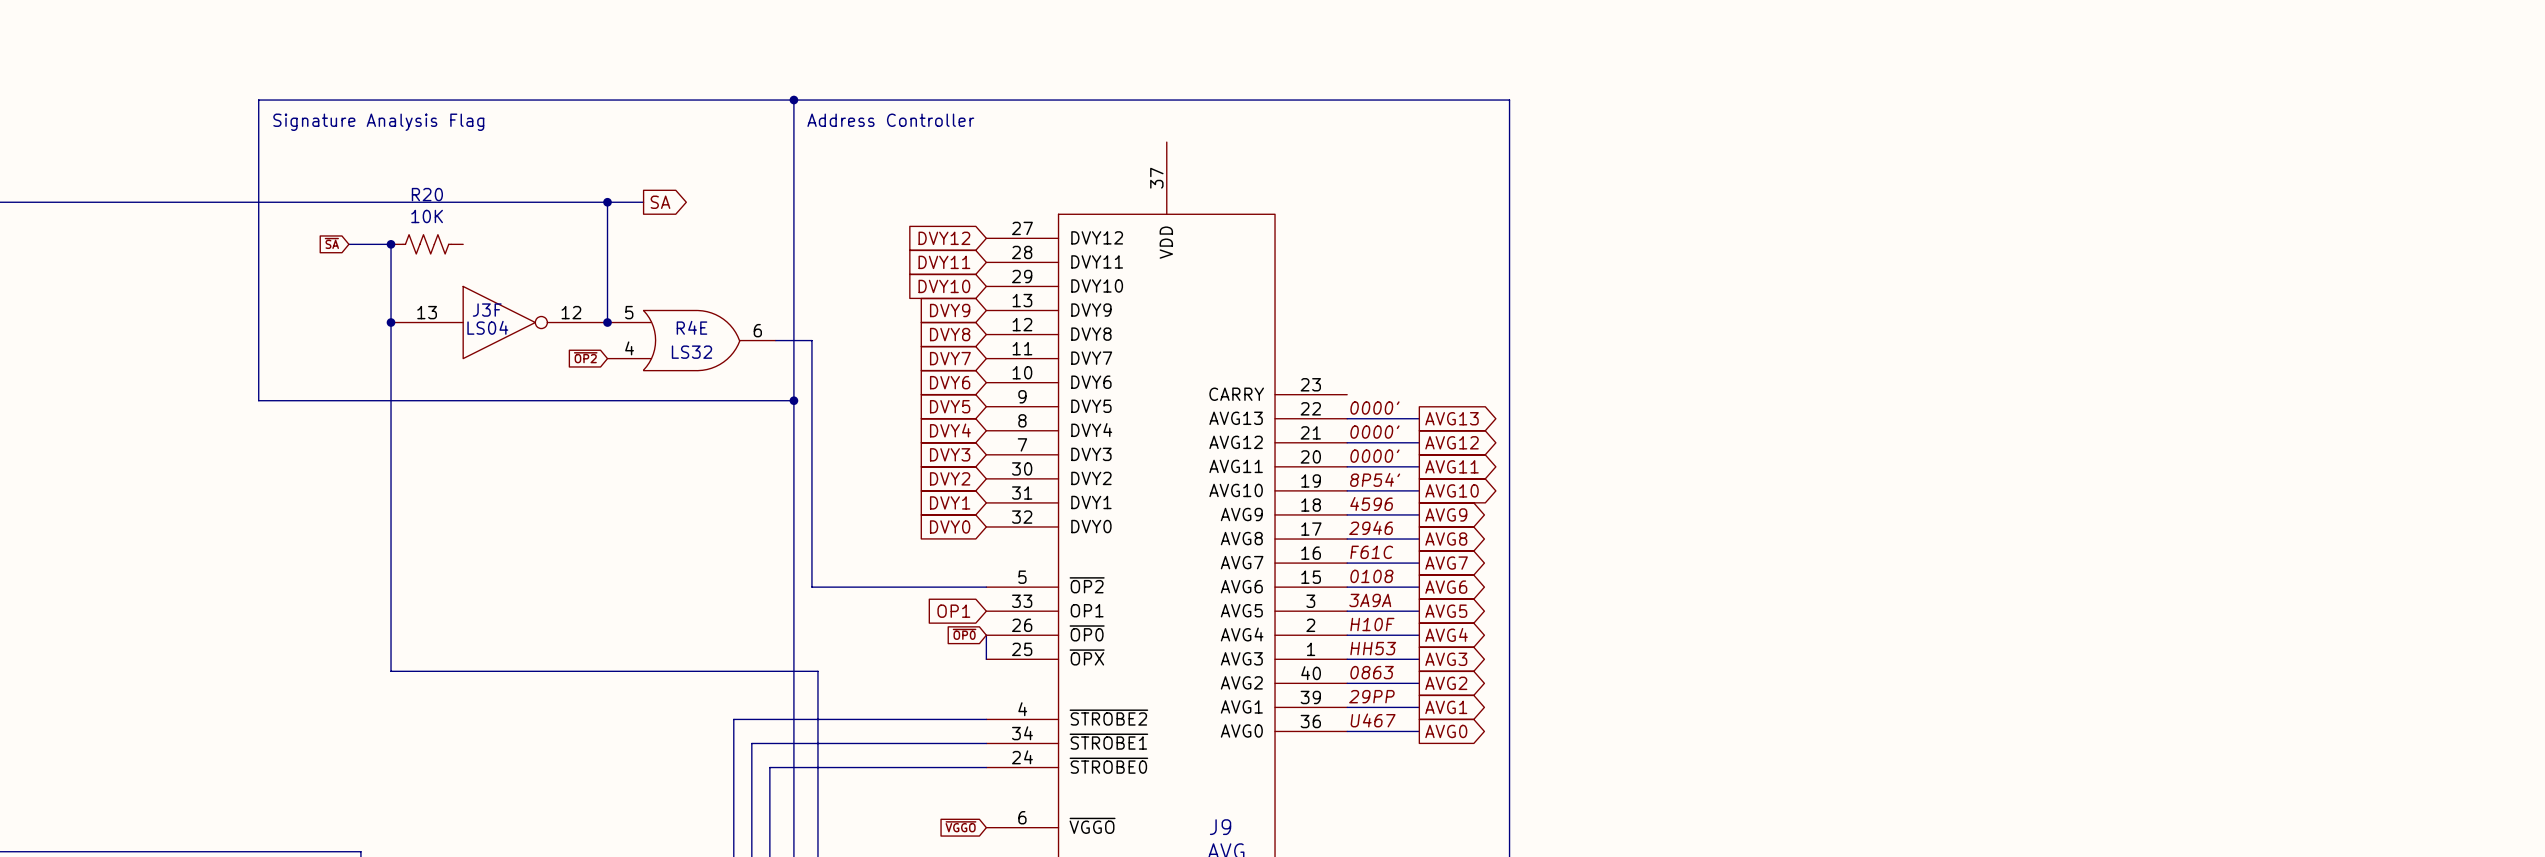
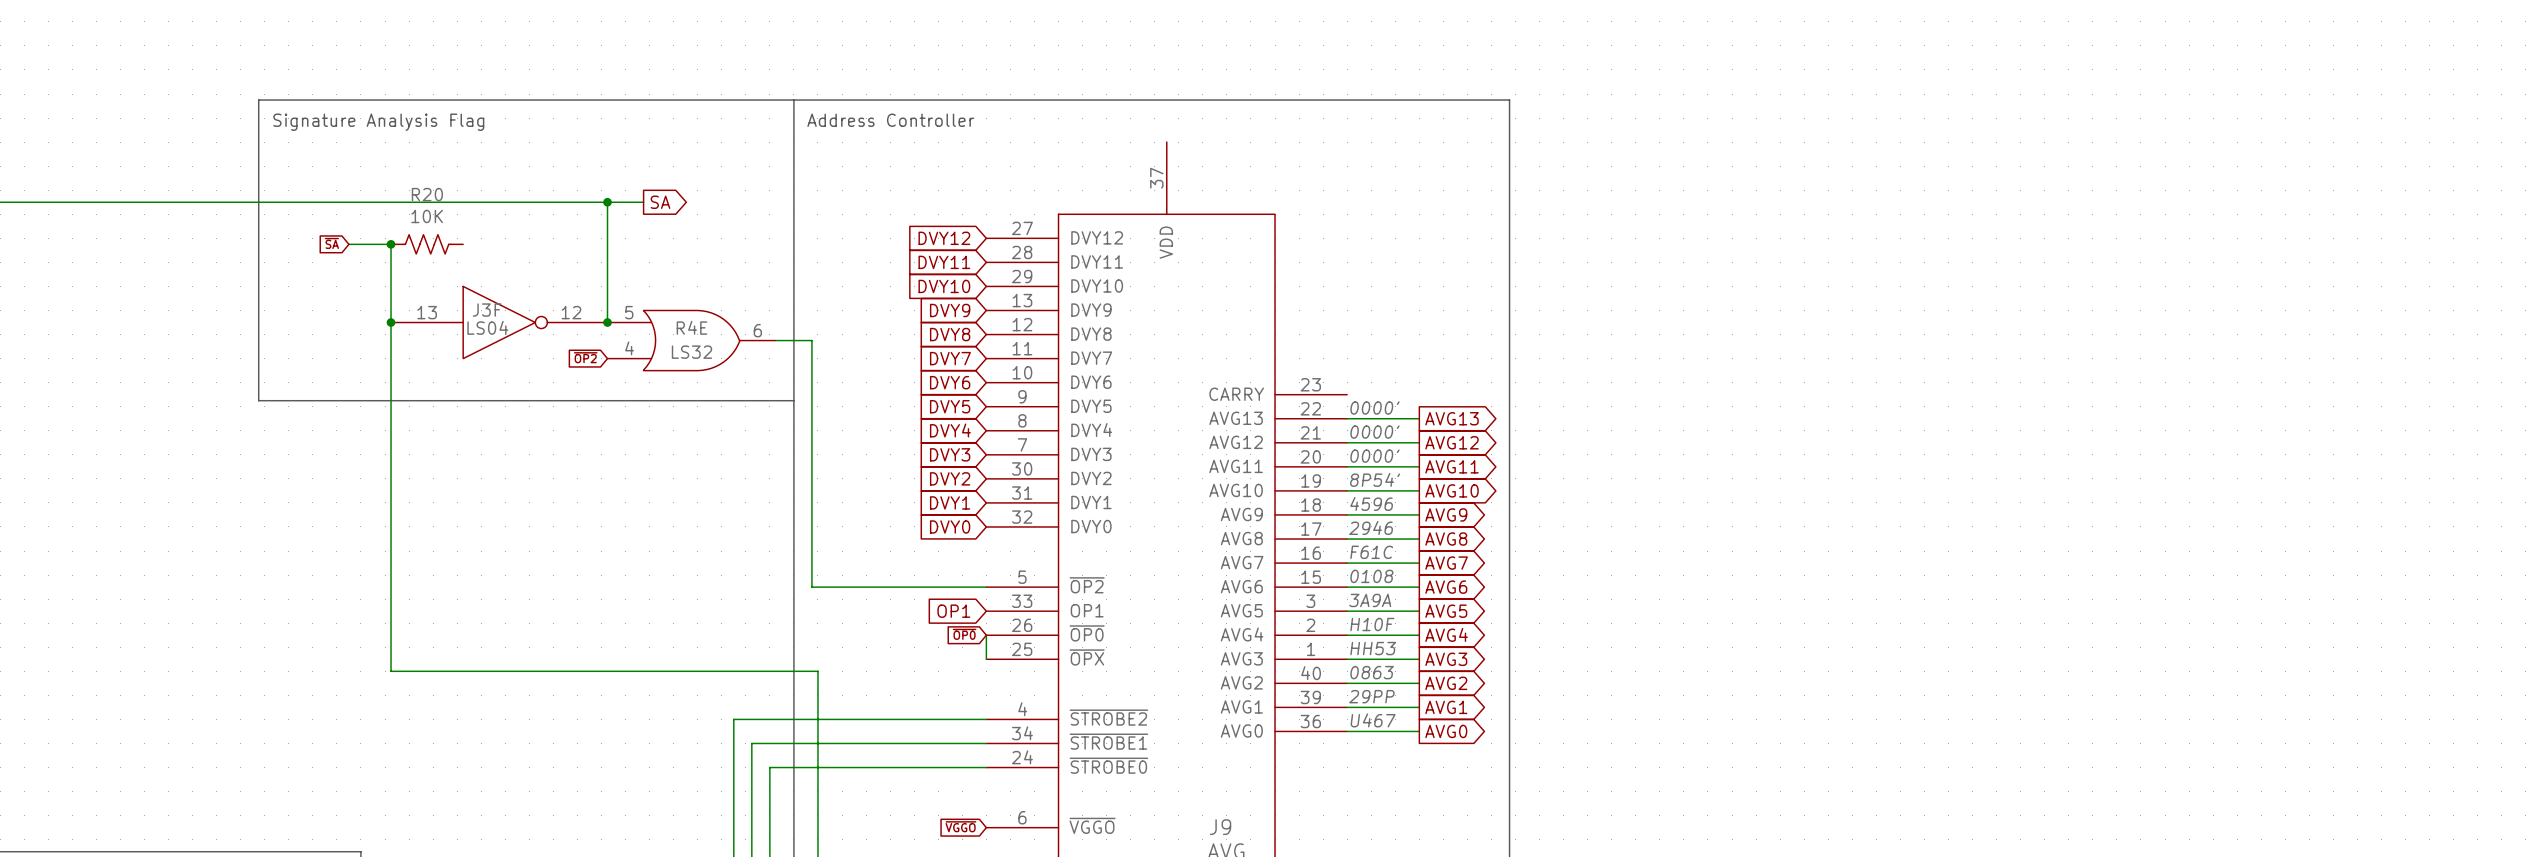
junction: (793, 100) -> none
junction: (793, 400) -> none

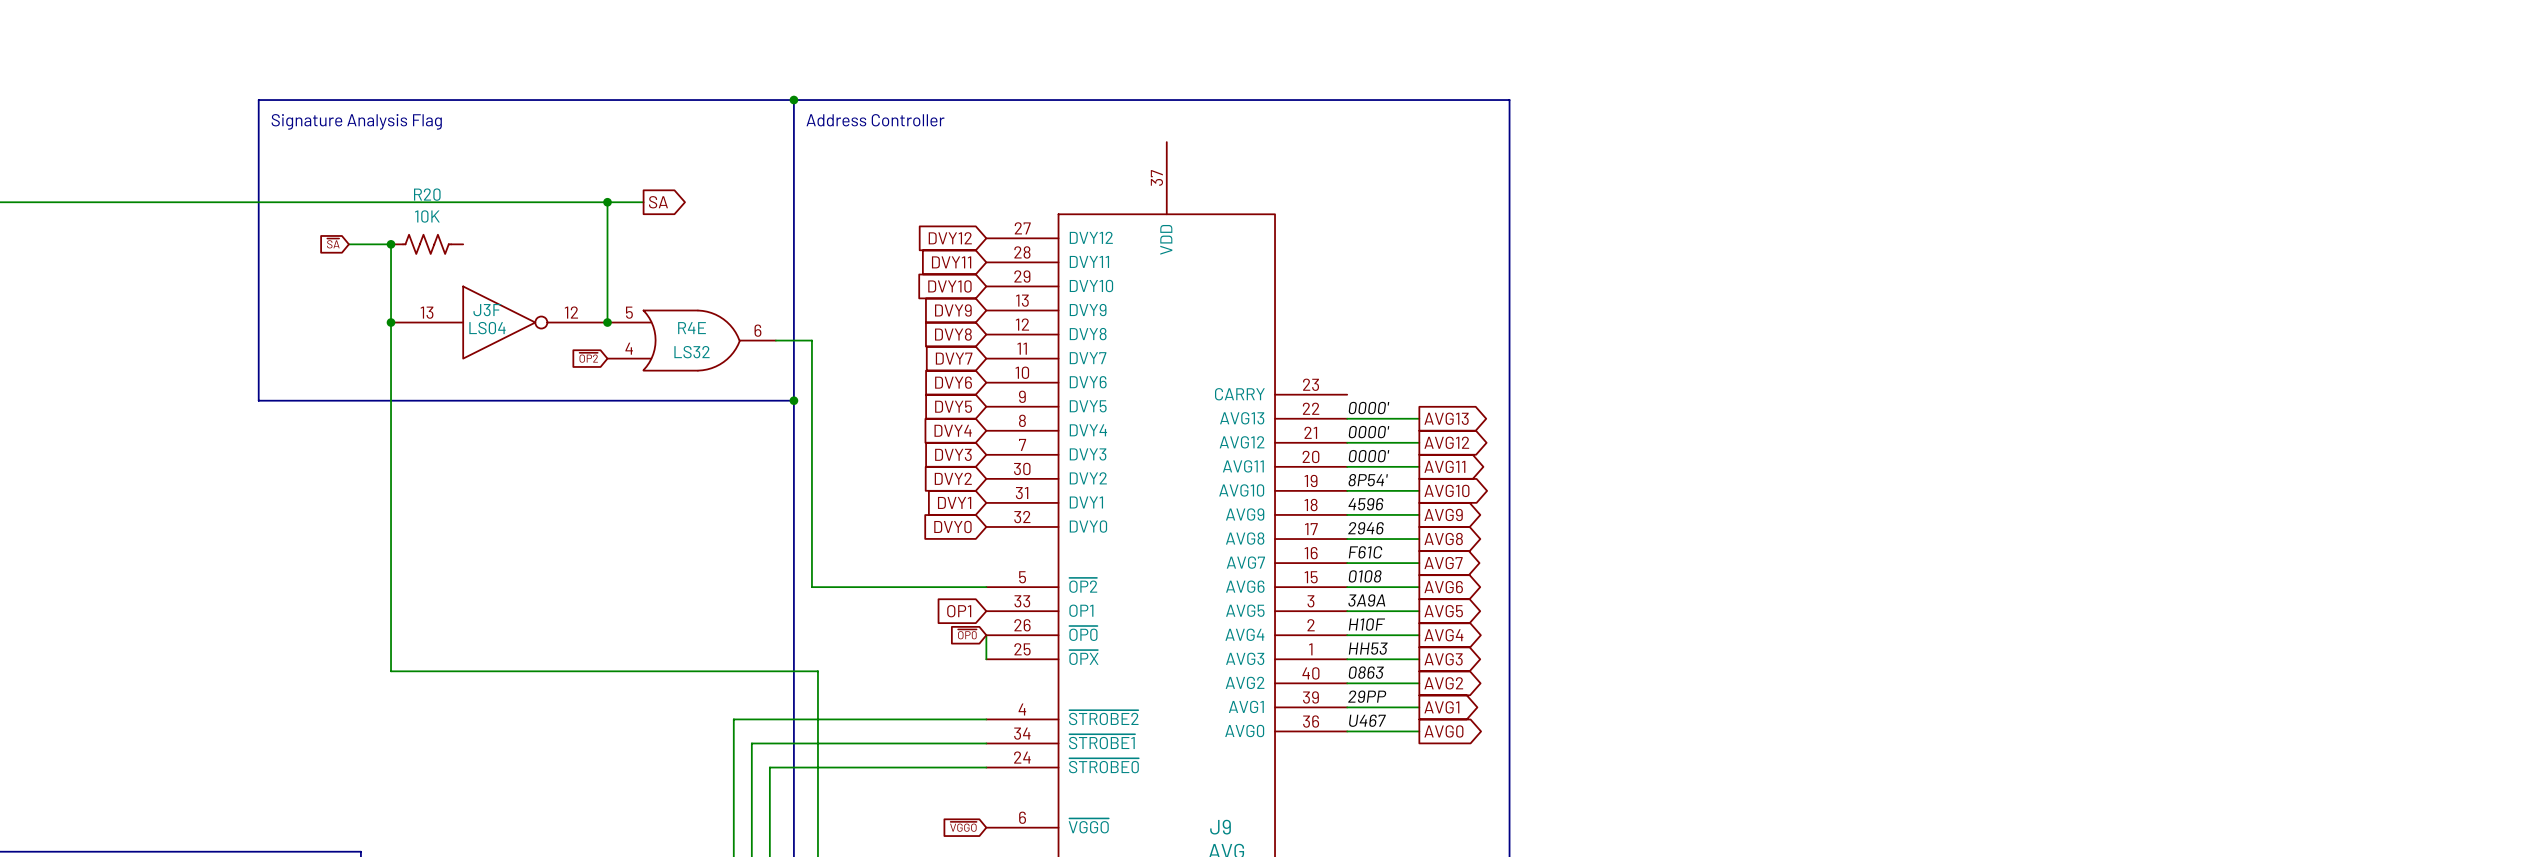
junction: none -> (793, 100)
junction: none -> (793, 400)

